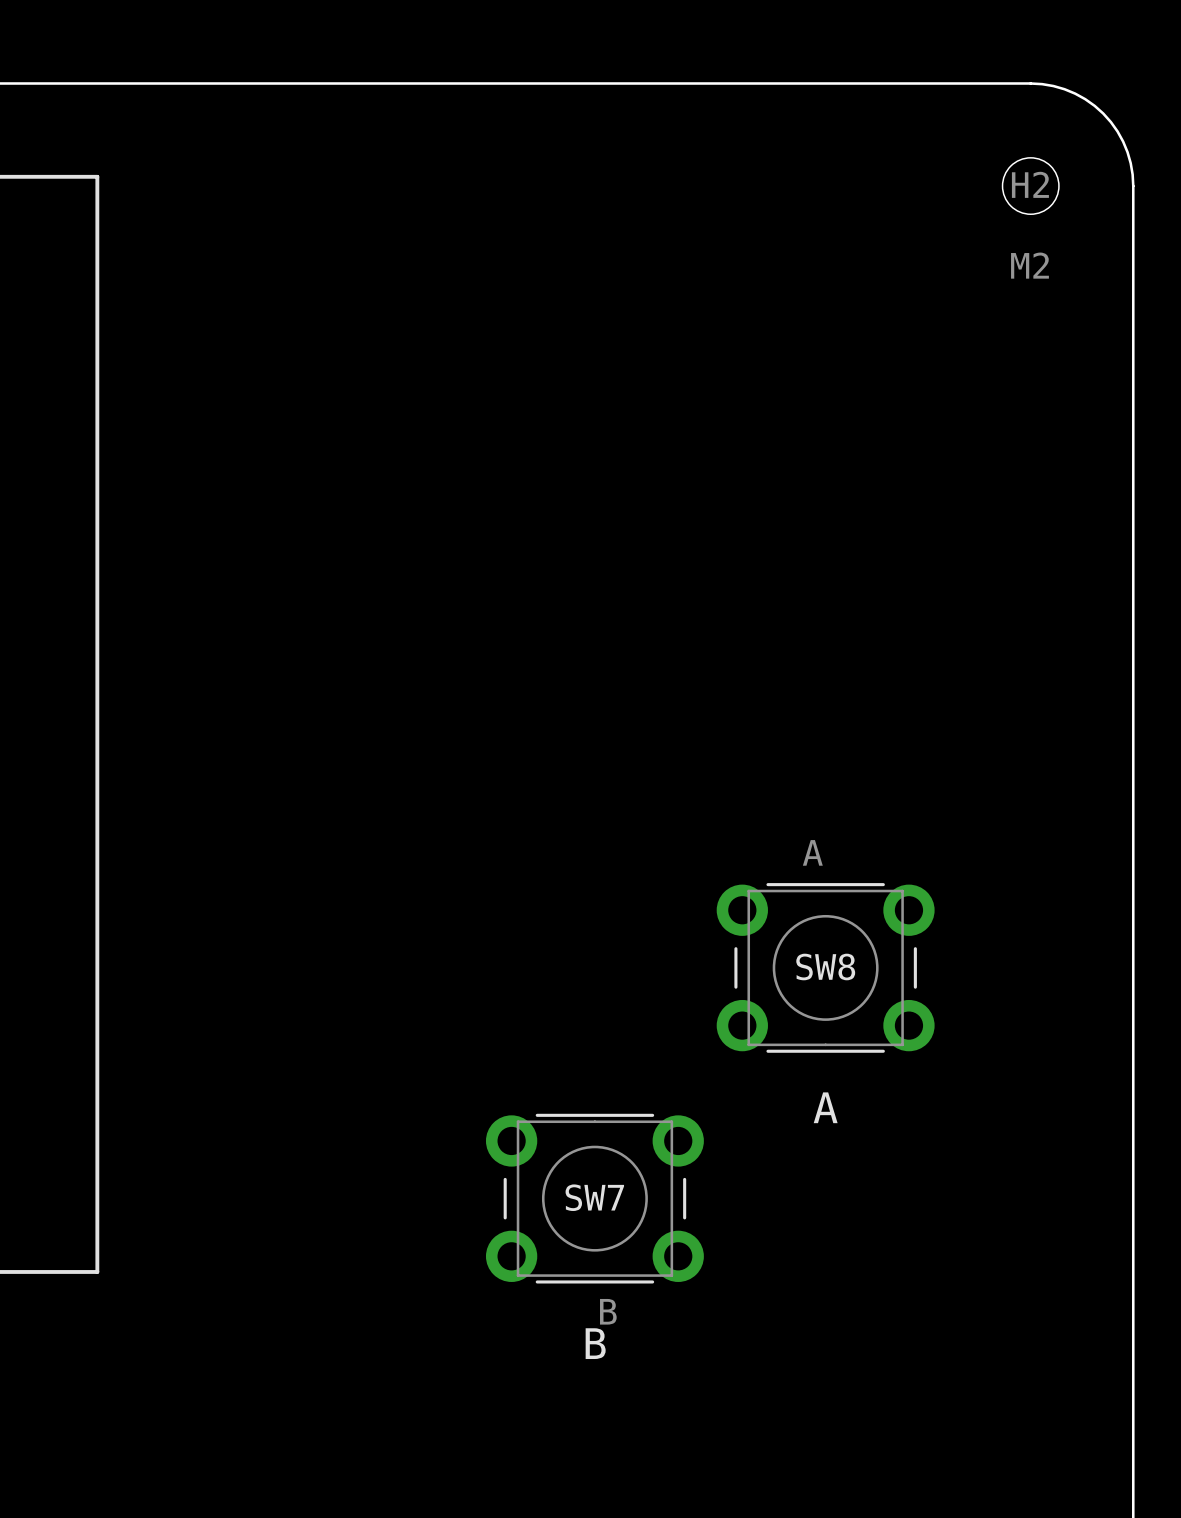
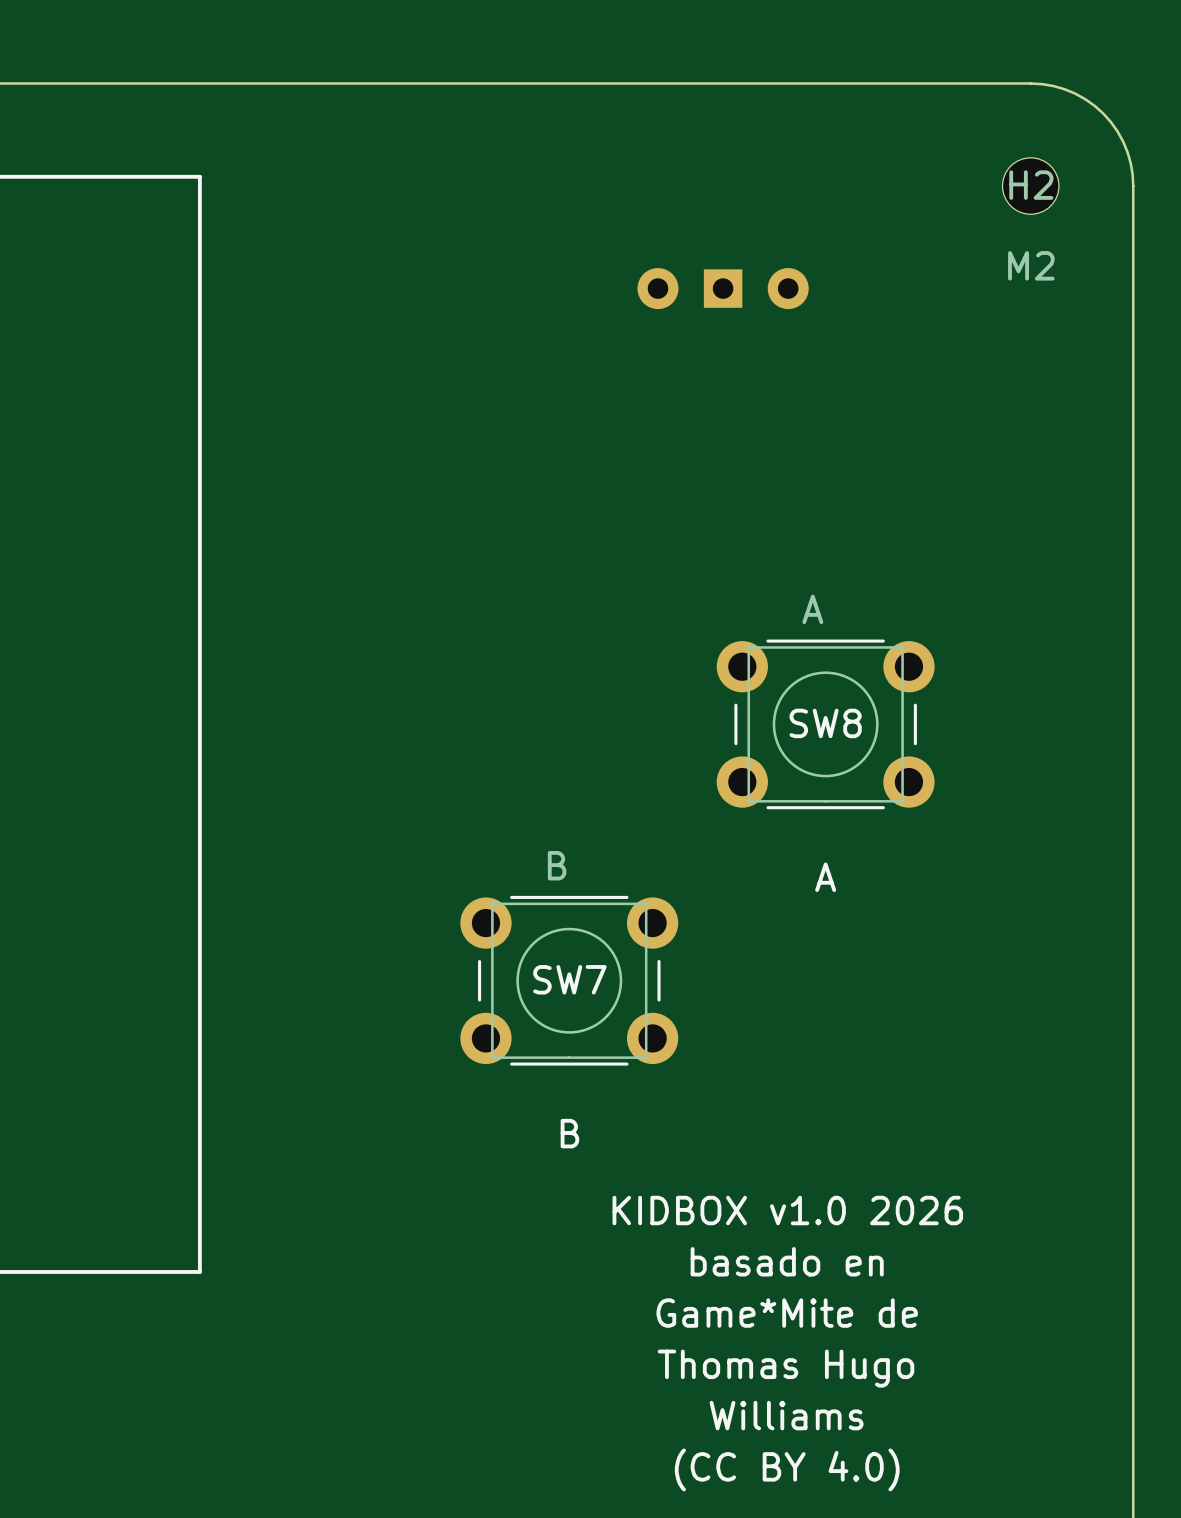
line: (97, 176) (97, 1271) -> (97, 176) (199, 176) (199, 1271) (97, 1271)
part: none -> (723, 288)
SW8 position: (825, 967) -> (825, 724)
text position: A (825, 1107) -> A (825, 877)
SW7 rotation: 0° (594, 1198) -> 180° (569, 980)
SW7 position: (594, 1198) -> (569, 980)
text: none -> KIDBOX v1.0 2026 (787, 1210)
text: none -> basado en (787, 1261)
text: none -> Game*Mite de (787, 1313)
text position: B (595, 1343) -> B (569, 1133)
text: none -> Thomas Hugo (785, 1368)
text: none -> Williams (786, 1415)
text: none -> (CC BY 4.0) (787, 1469)

